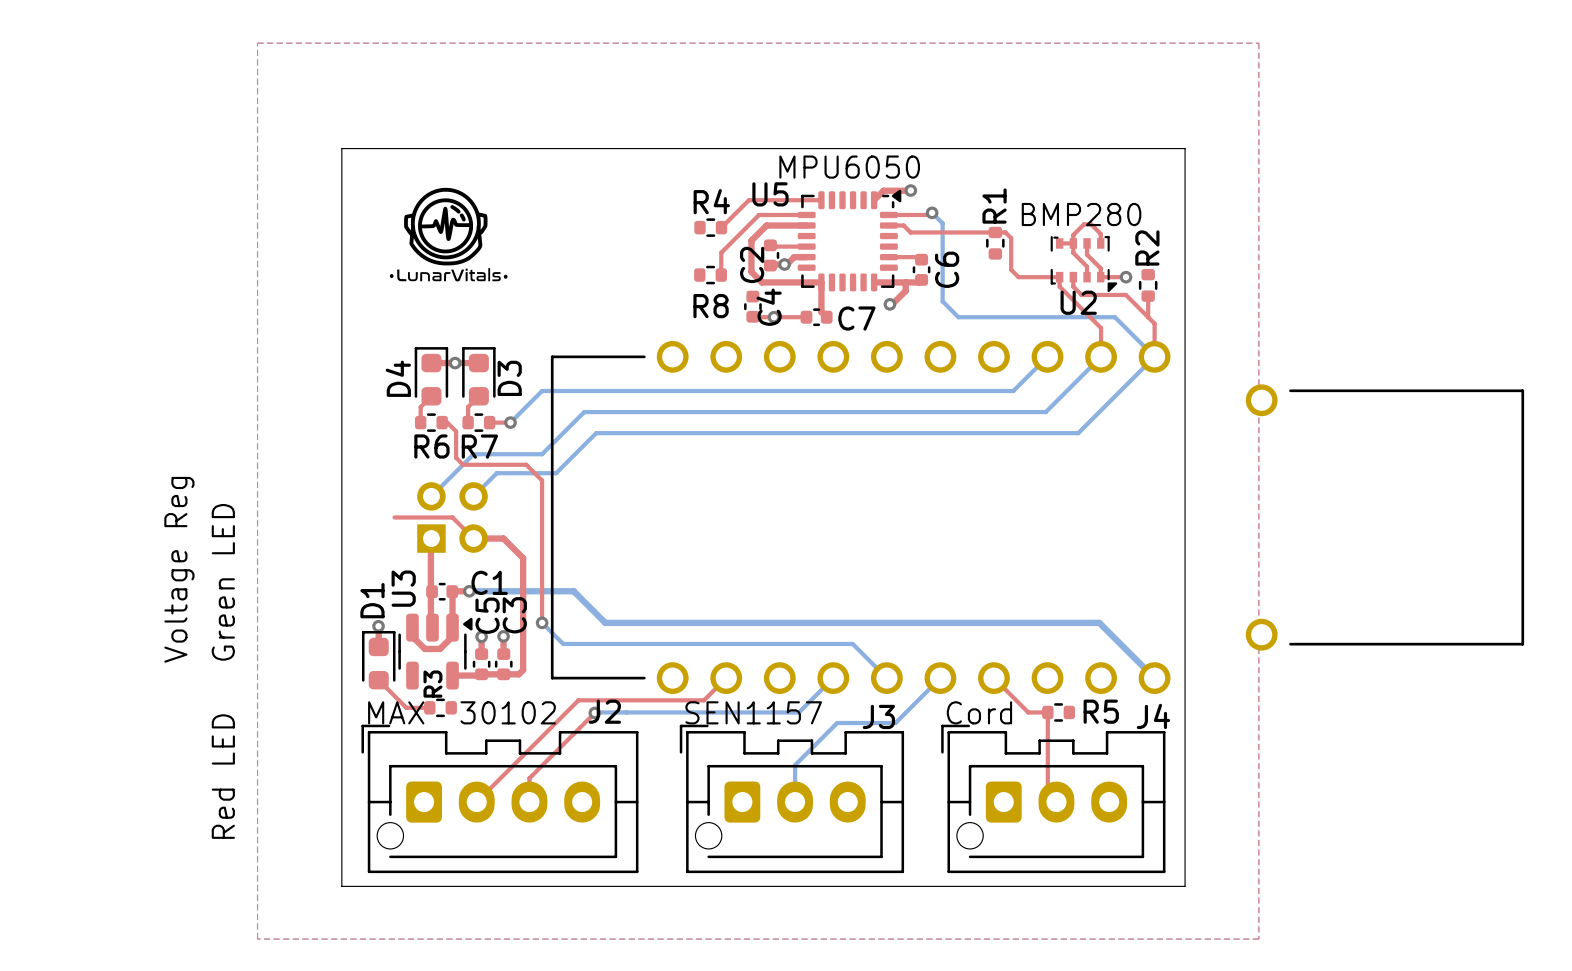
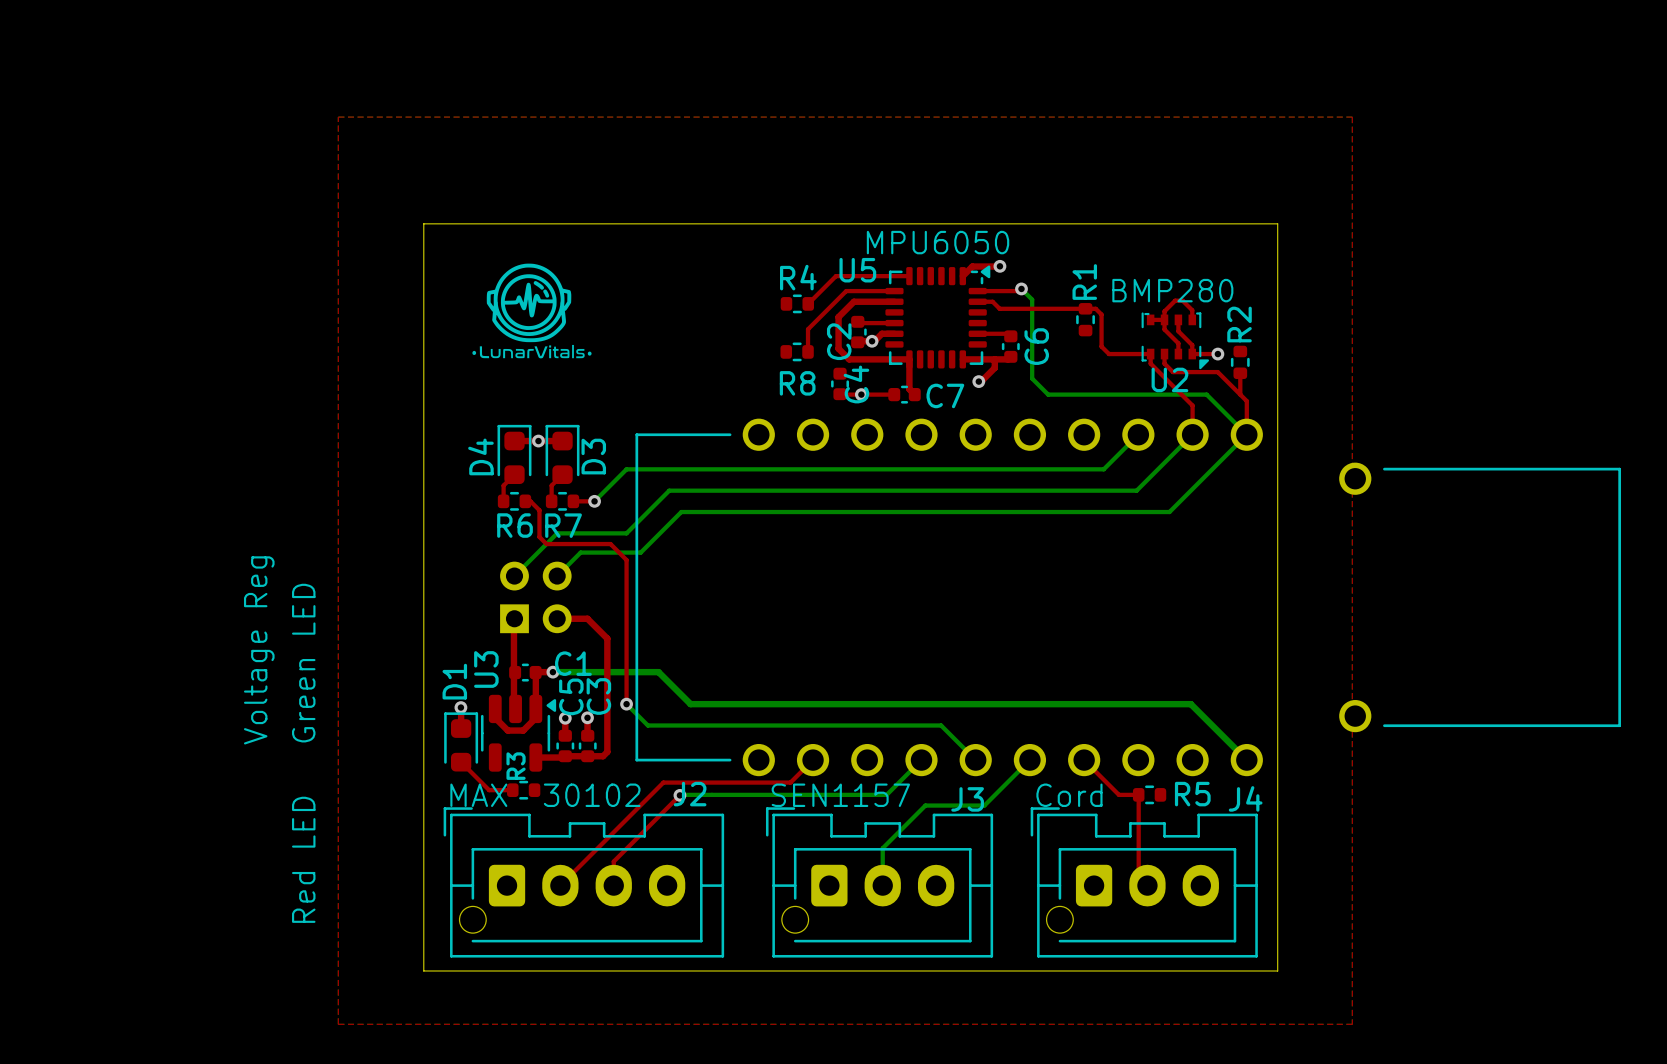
top track: (394, 517) (452, 517) (473, 538) -> none

